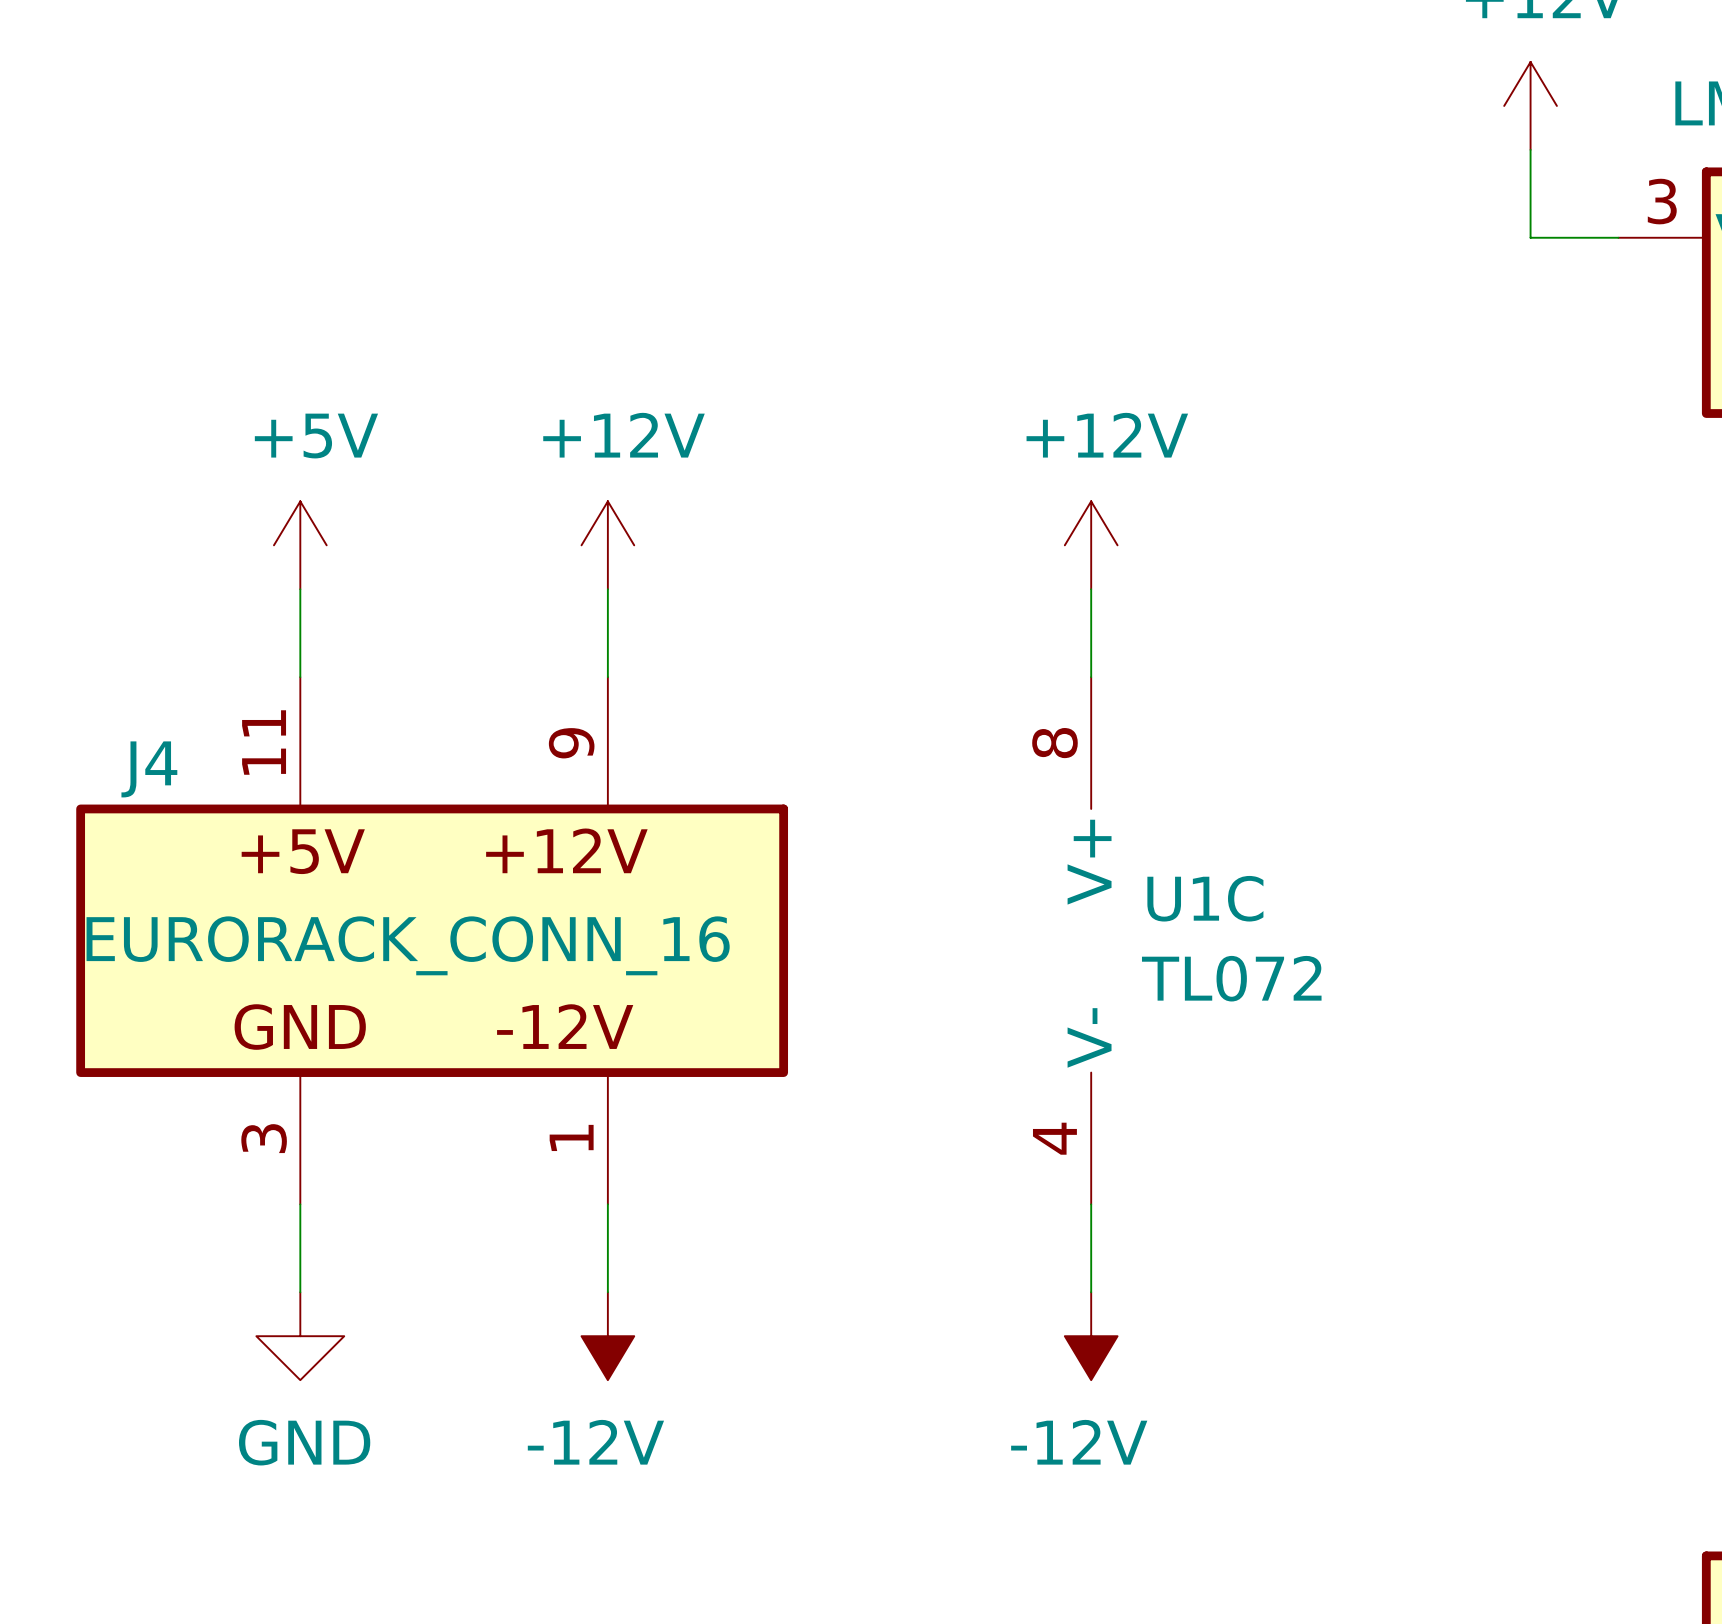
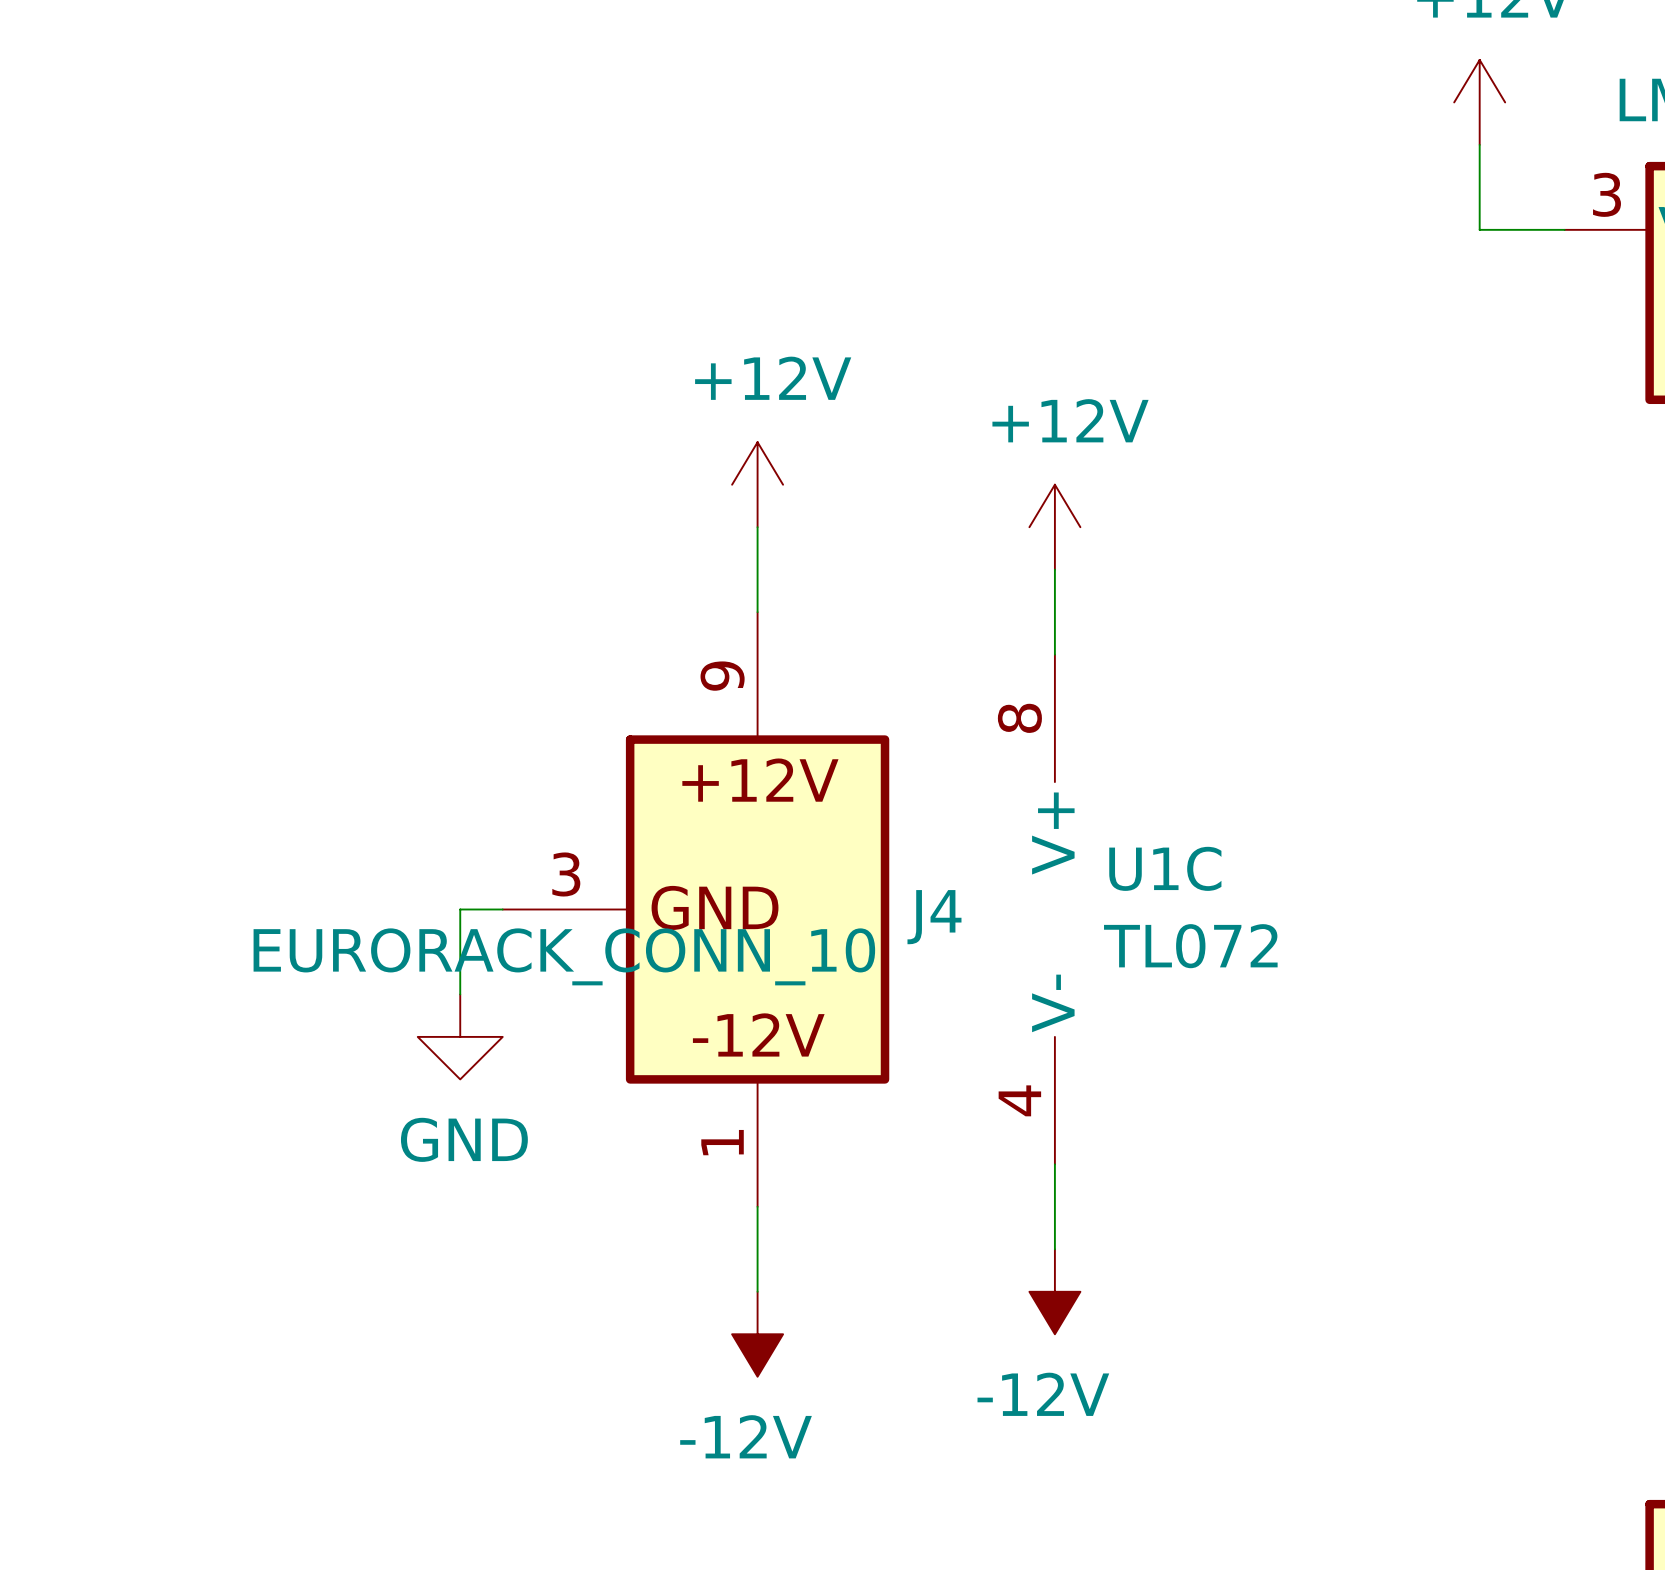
power symbol: +5V (300, 545) -> none
power symbol position: +12V (607, 545) -> +12V (757, 484)
wire: (300, 589) (300, 677) -> none
wire: (607, 589) (607, 677) -> (757, 527) (757, 612)
J4 symbol: [76, 677, 789, 1205] -> [502, 612, 890, 1207]
J4 name position: J4 (149, 769) -> J4 (934, 917)
J4 value: EURORACK_CONN_16 (408, 945) -> EURORACK_CONN_10 (564, 956)
wire: (300, 1204) (300, 1292) -> none
wire: (607, 1204) (607, 1292) -> (757, 1206) (757, 1291)
power symbol position: GND (300, 1336) -> GND (460, 1036)
power symbol position: -12V (607, 1336) -> -12V (757, 1334)

